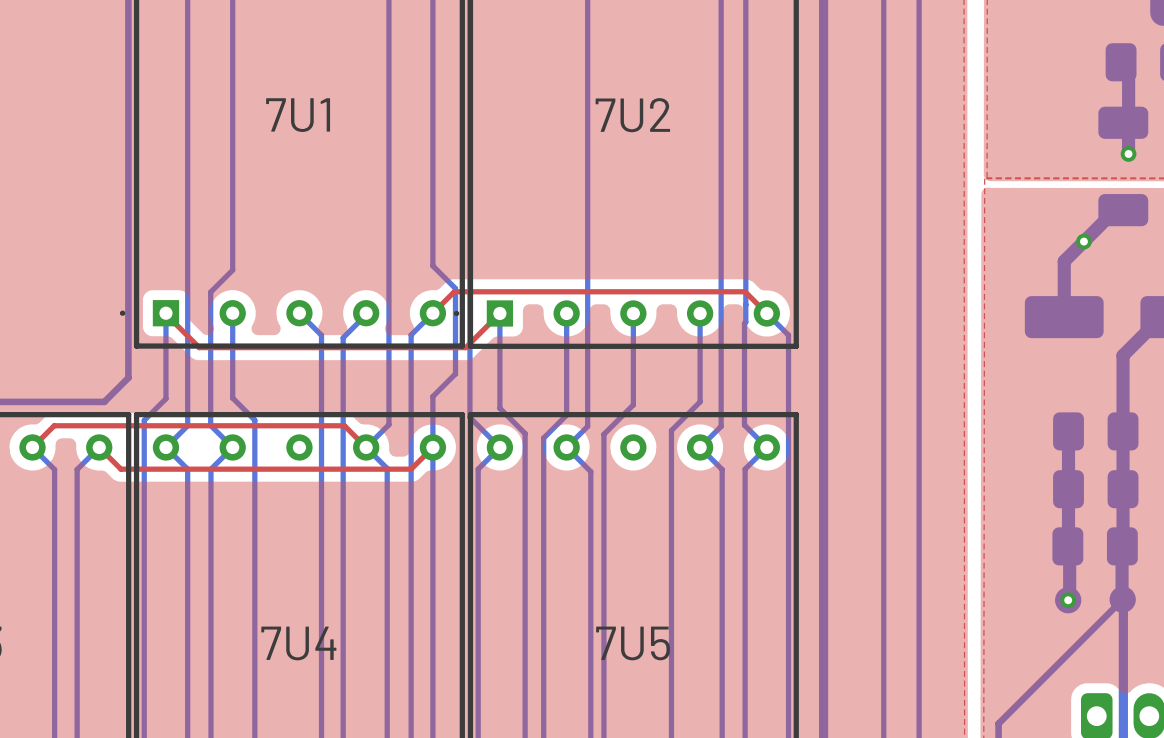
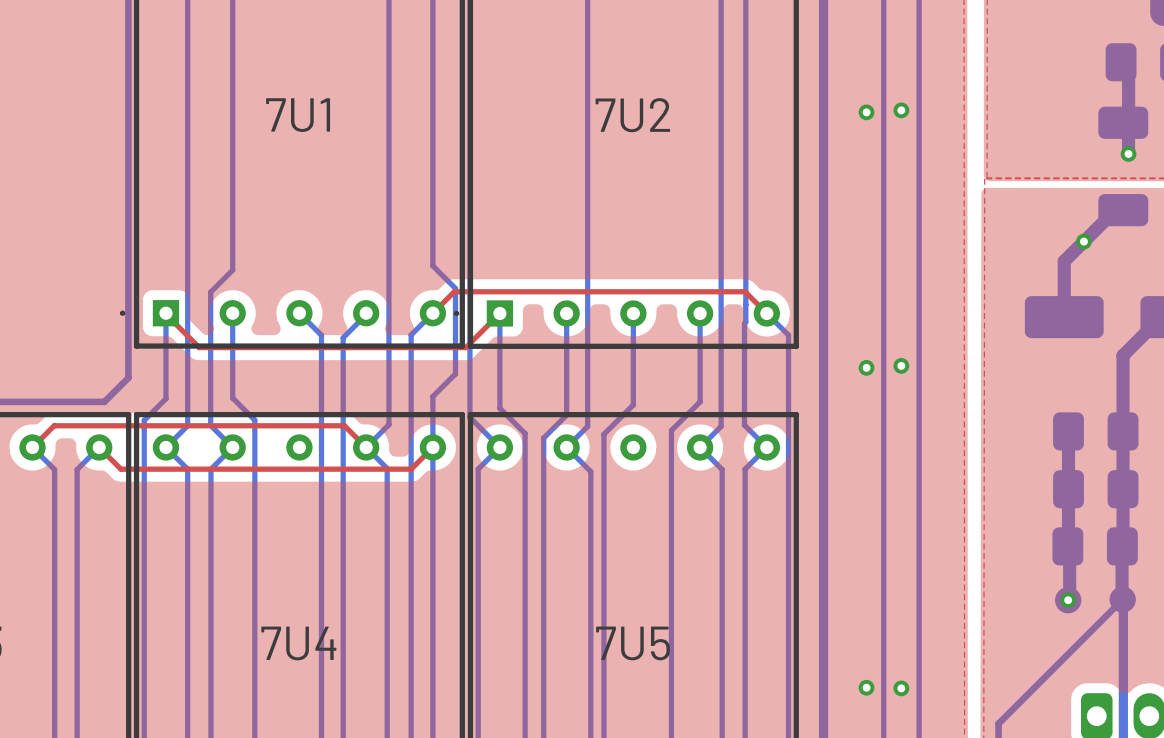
via: none -> (901, 110)
via: none -> (866, 112)
via: none -> (901, 365)
via: none -> (866, 367)
via: none -> (866, 687)
via: none -> (901, 688)

